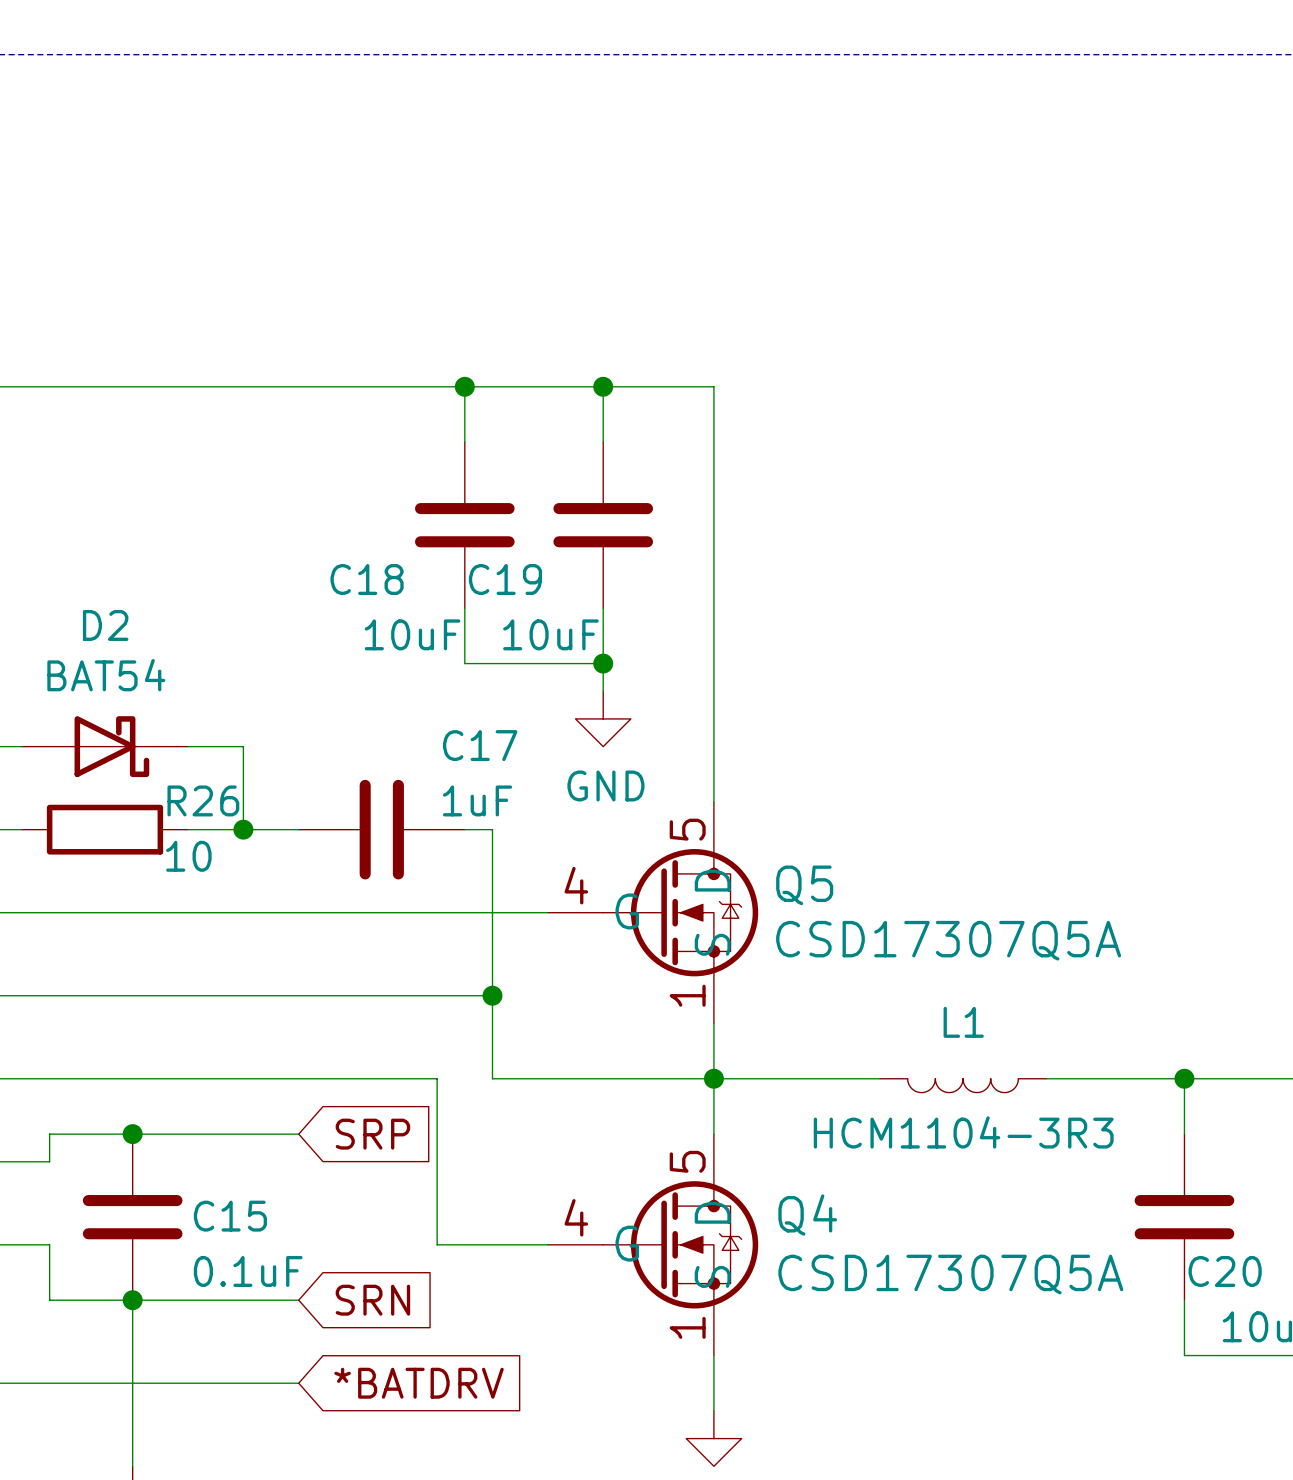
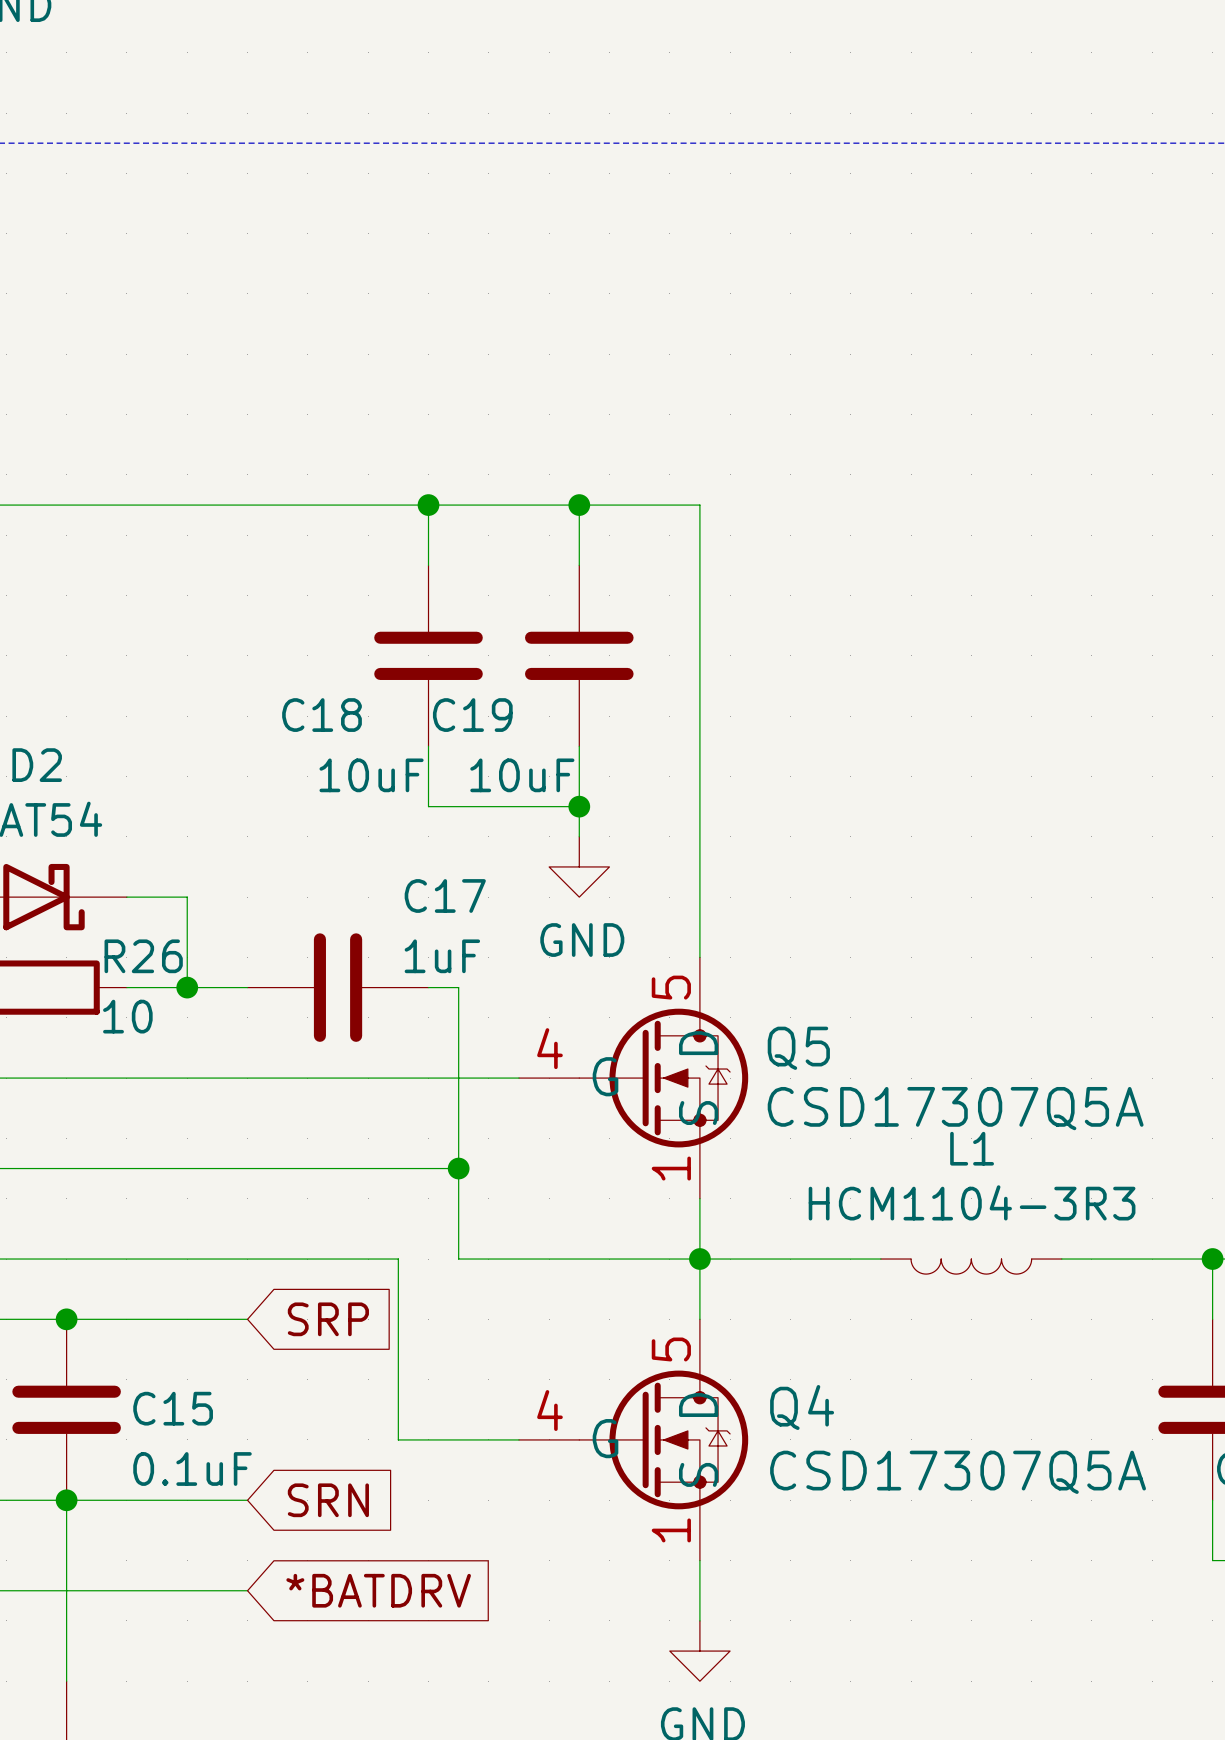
L1 name position: L1 (963, 1022) -> L1 (972, 1148)
L1 value position: HCM1104-3R3 (963, 1132) -> HCM1104-3R3 (972, 1202)

